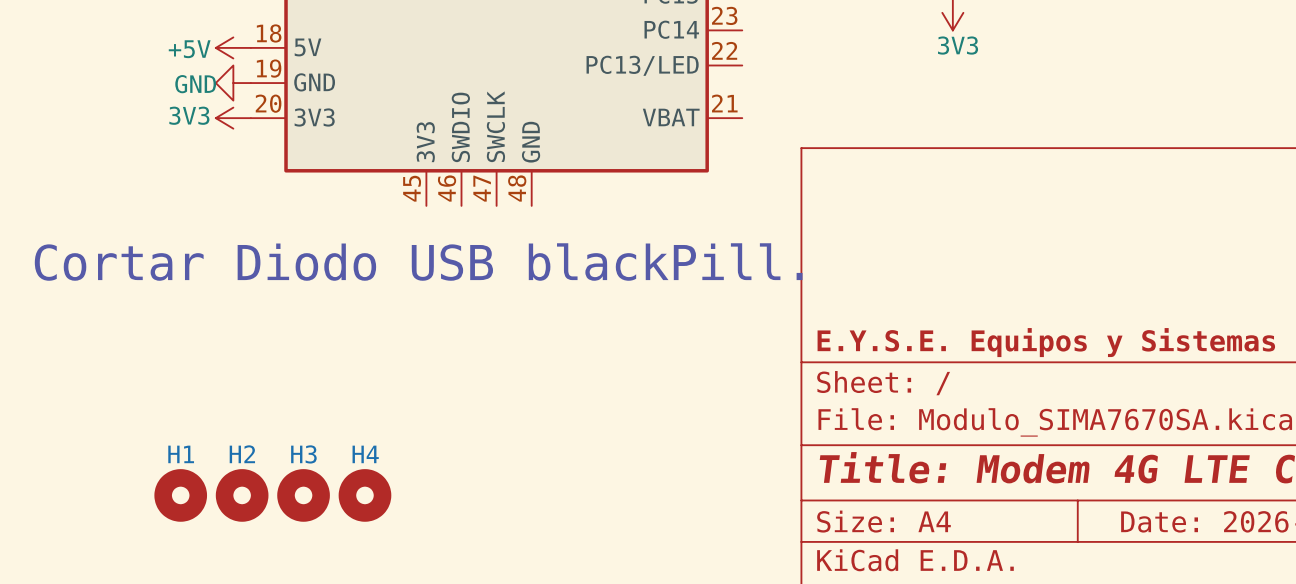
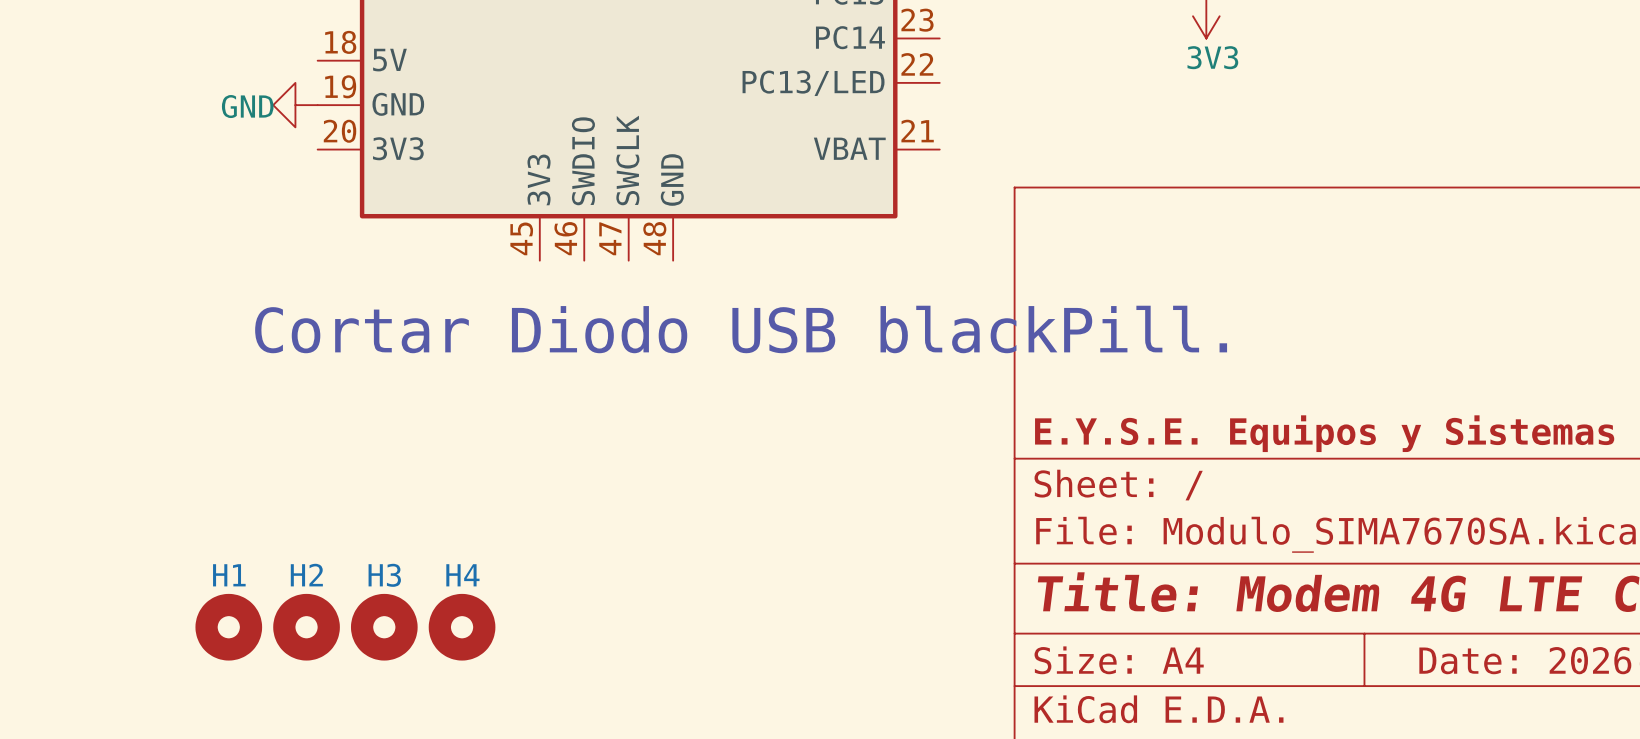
power symbol: +5V (233, 47) -> none
power symbol: 3V3 (233, 118) -> none
text position: Cortar Diodo USB blackPill. (418, 262) -> Cortar Diodo USB blackPill. (741, 329)

